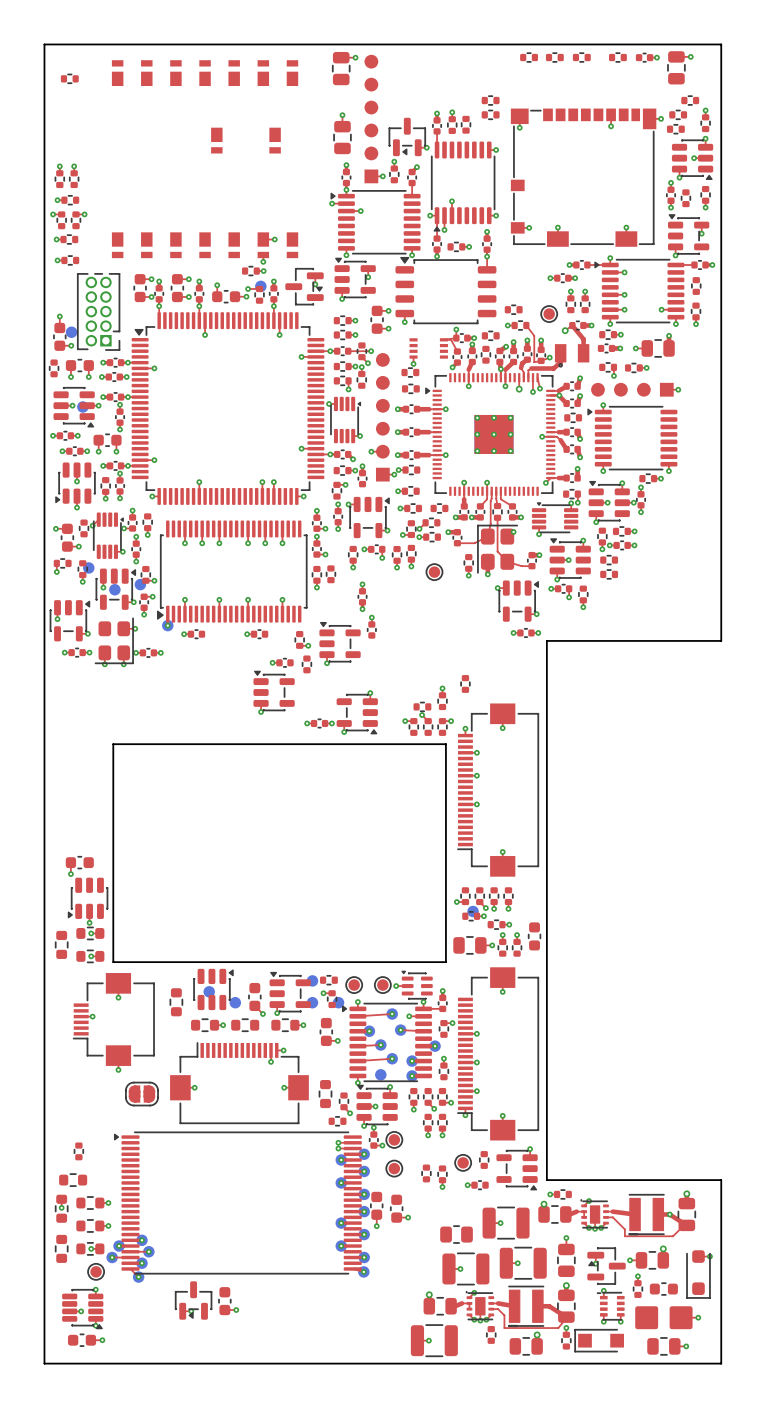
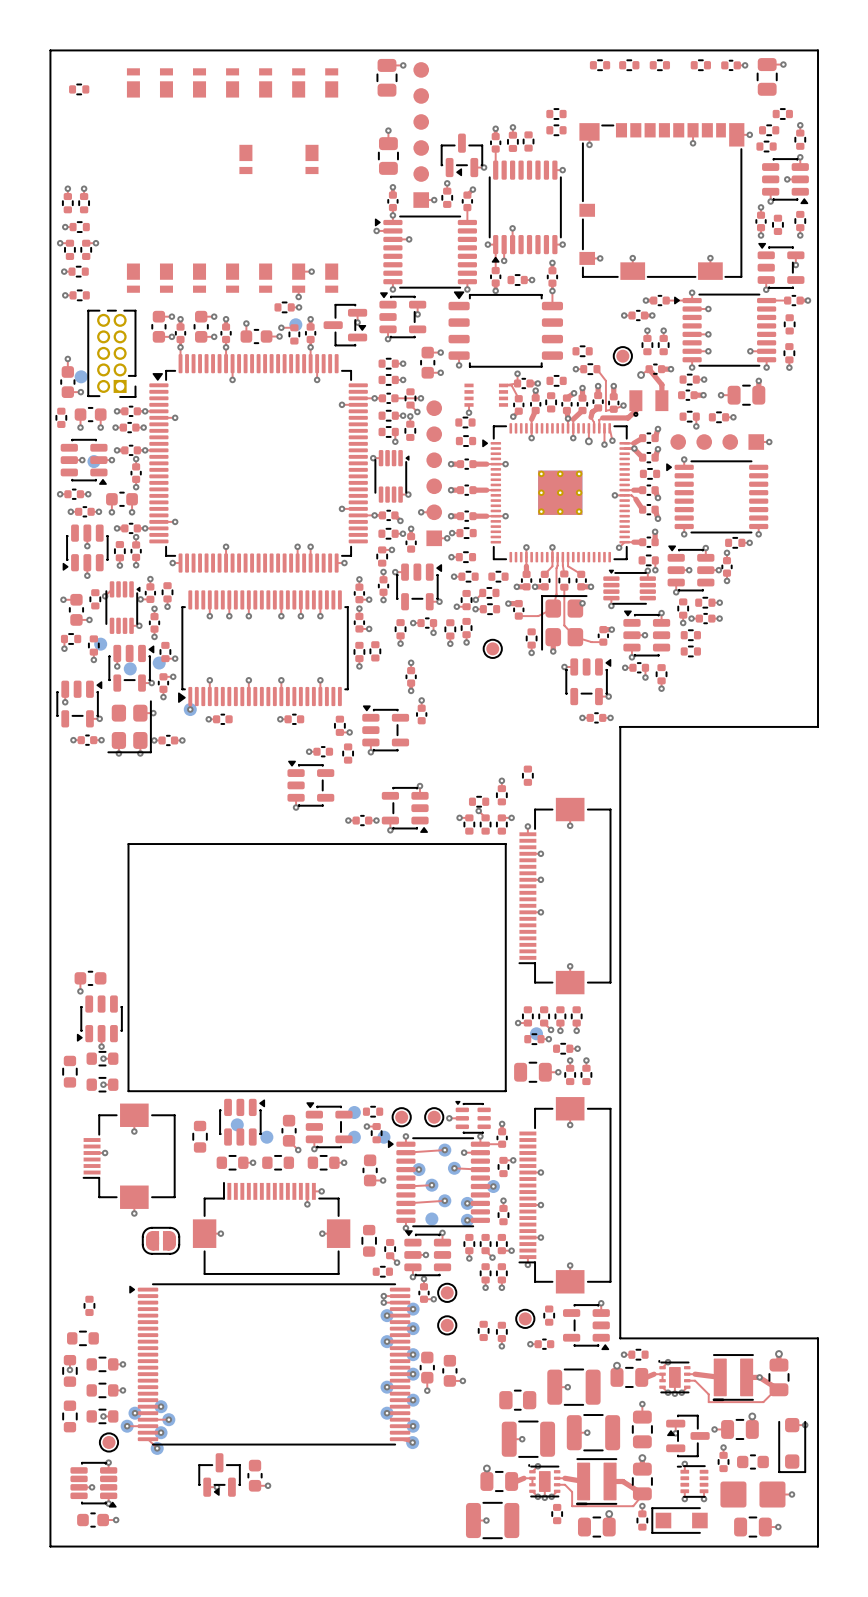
part: (534, 936) -> none

